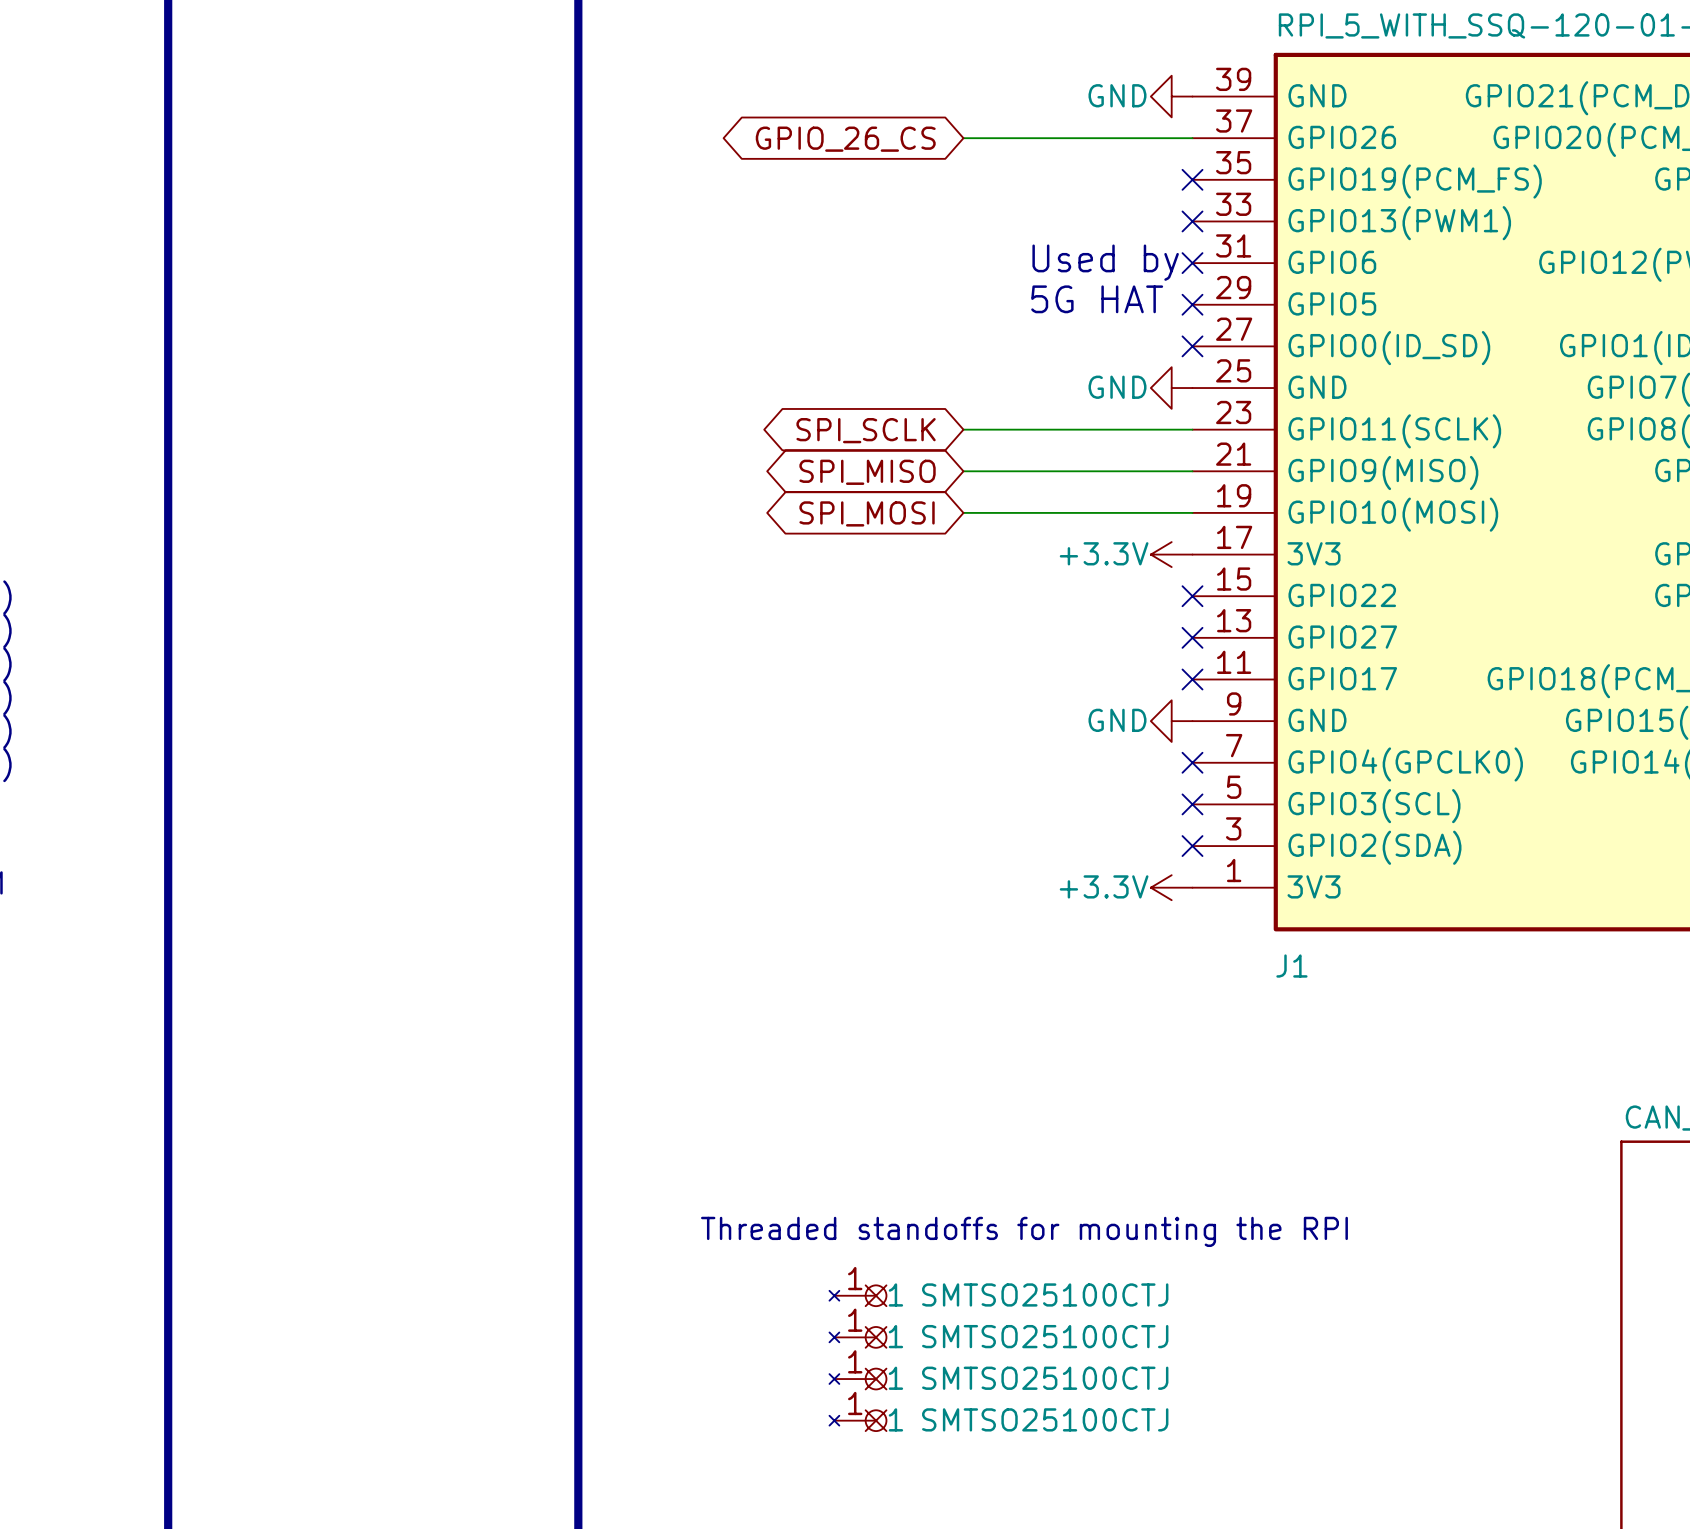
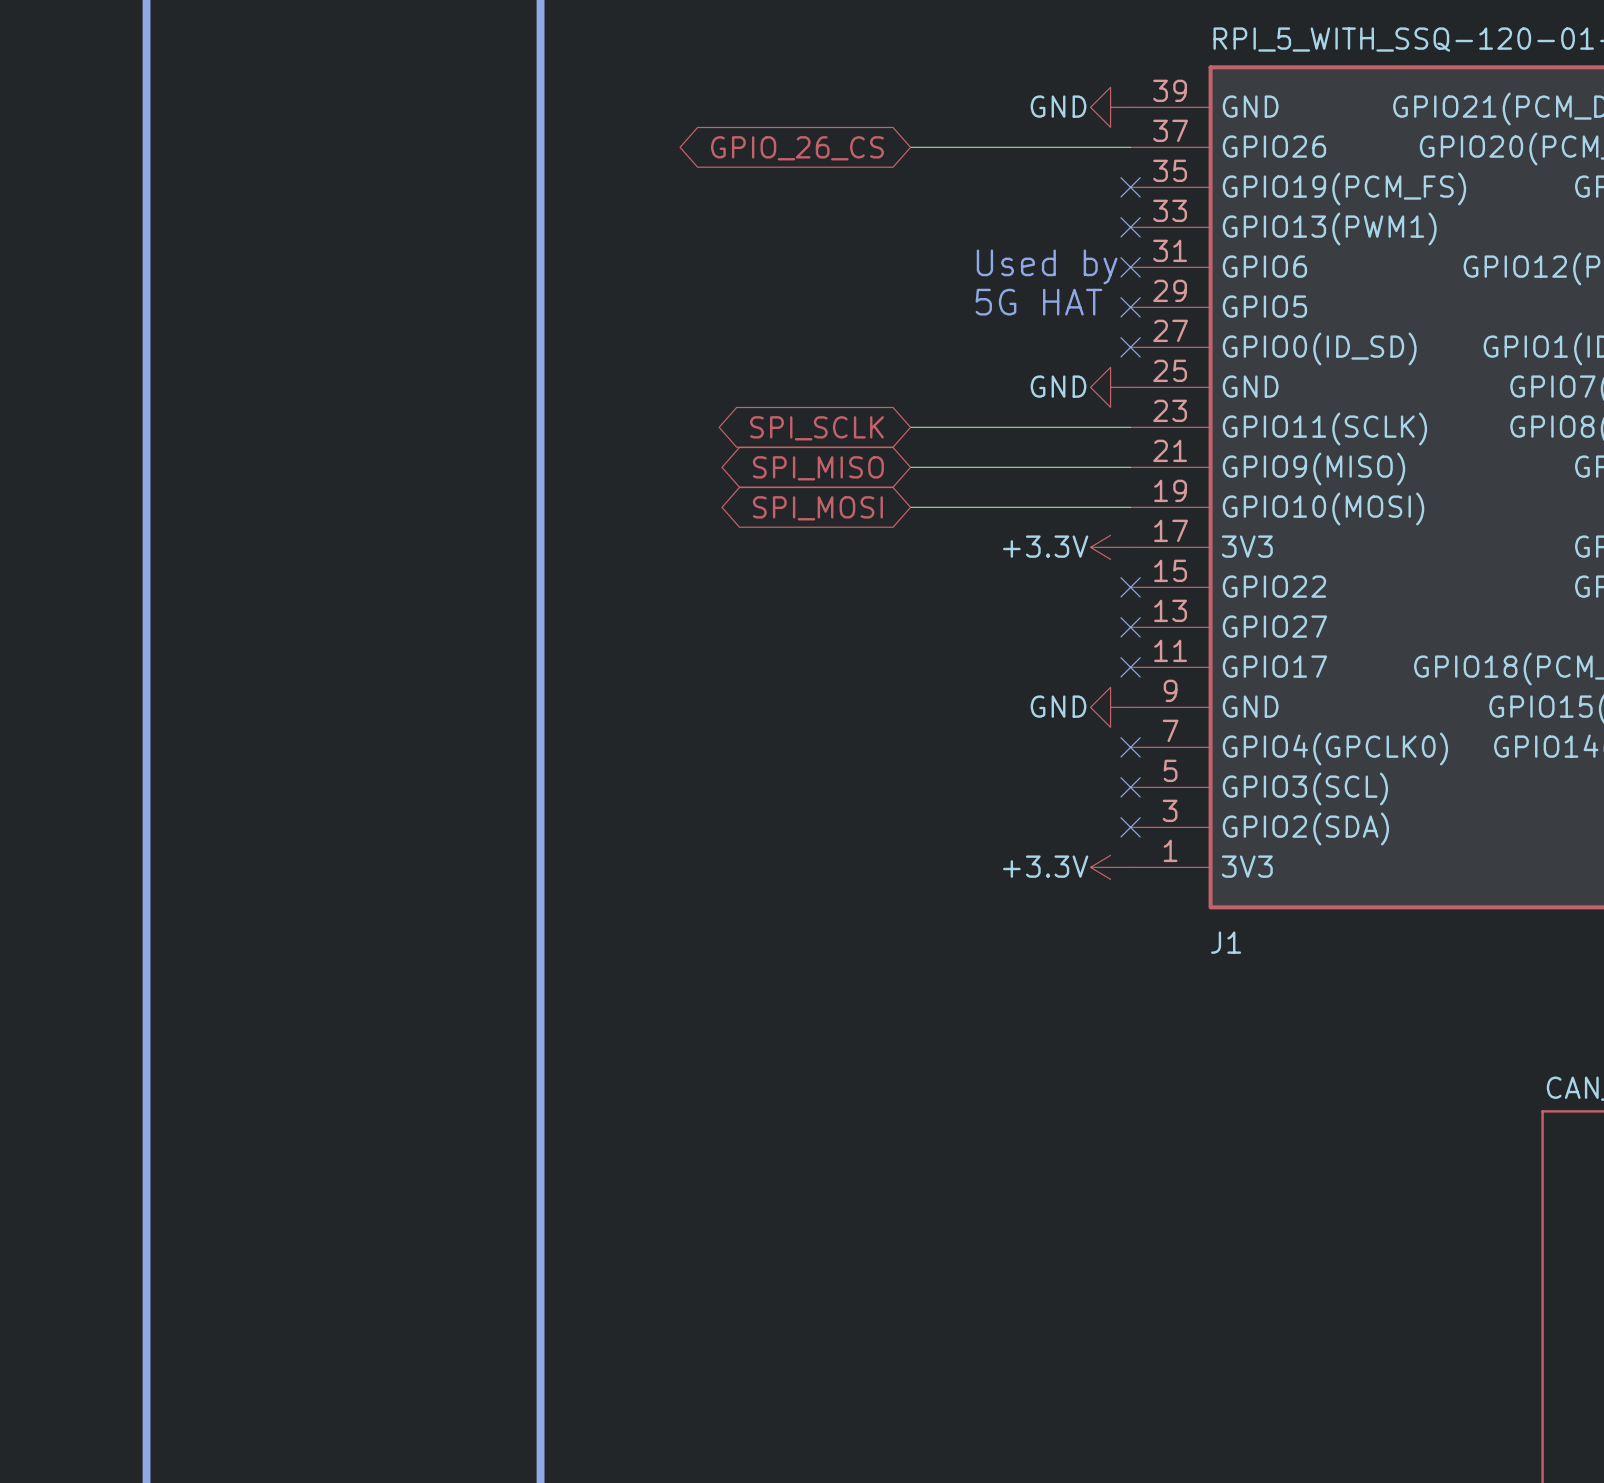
text: Threaded standoffs for mounting the RPI (1024, 1231) -> none
part: SMTSO25100CTJ (857, 1295) -> none
part: SMTSO25100CTJ (857, 1337) -> none
part: SMTSO25100CTJ (857, 1379) -> none
part: SMTSO25100CTJ (857, 1420) -> none

